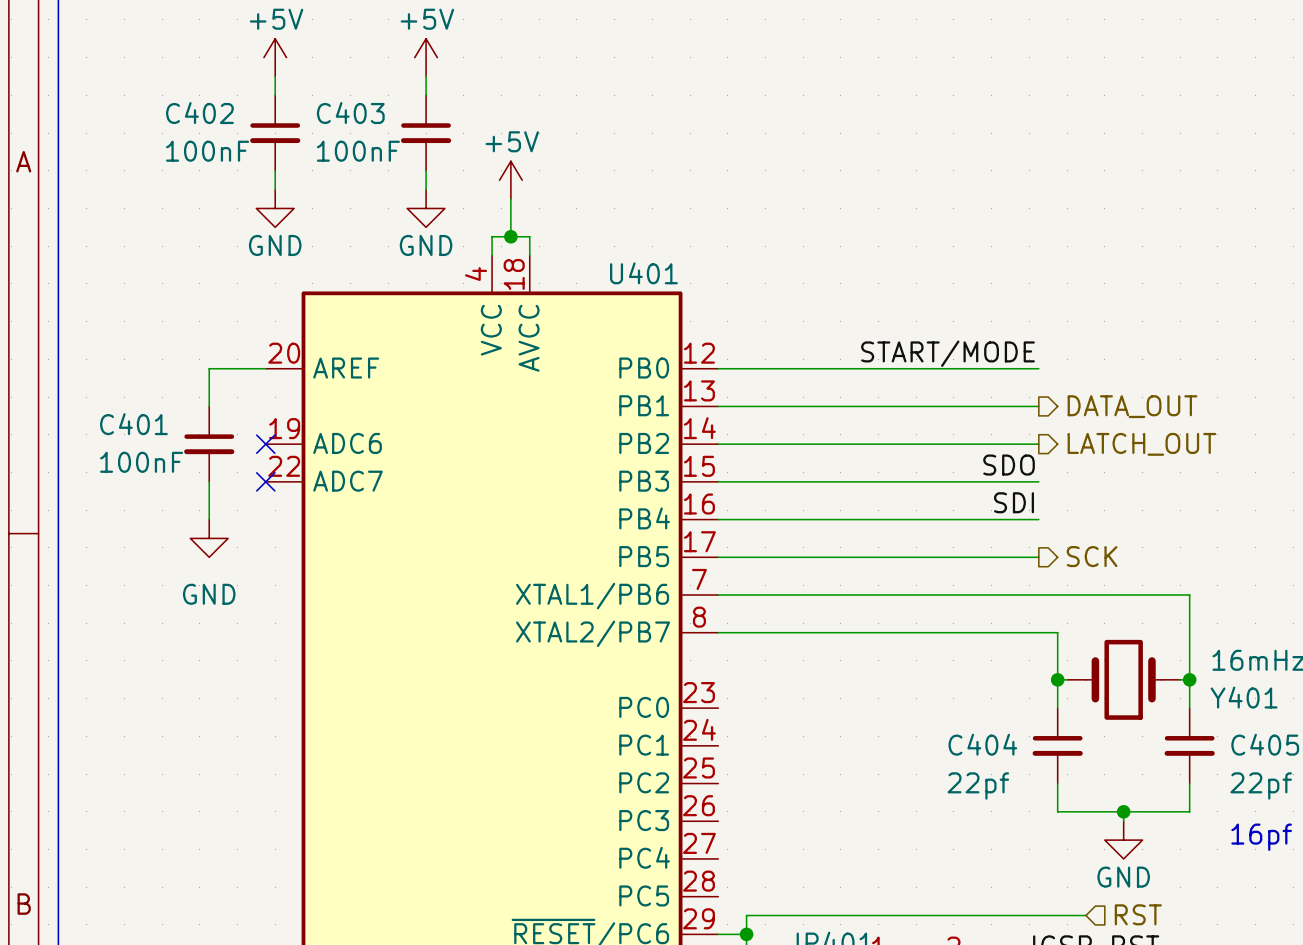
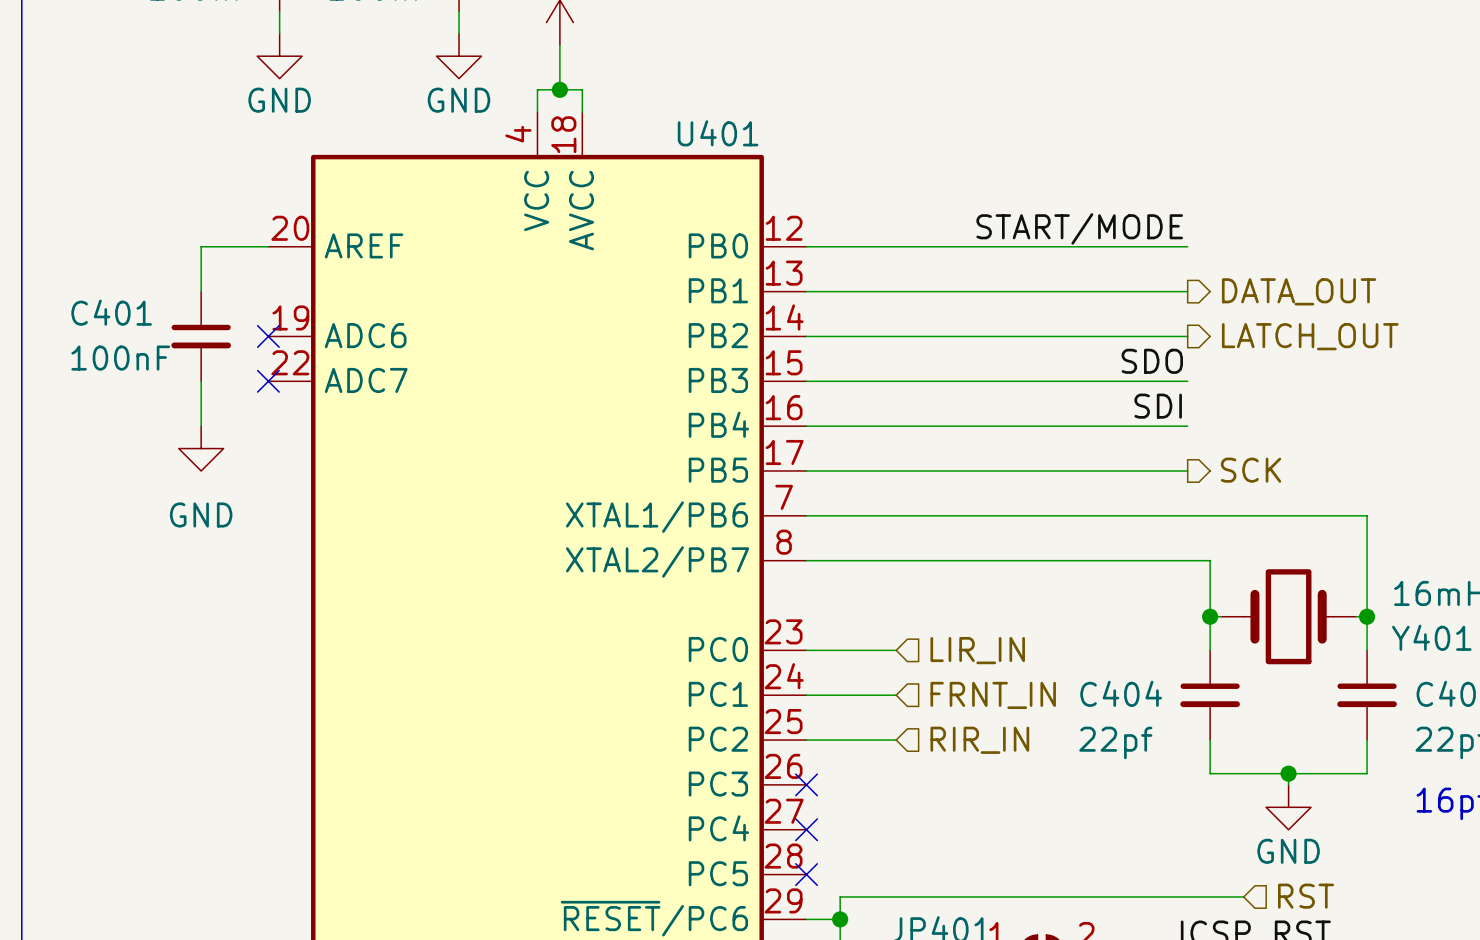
wire: none -> (806, 650) (896, 650)
hierarchical label: none -> LIR_IN (977, 650)
wire: none -> (806, 695) (896, 695)
hierarchical label: none -> FRNT_IN (993, 695)
wire: none -> (806, 740) (896, 740)
hierarchical label: none -> RIR_IN (979, 740)
no-connect mark: none -> (806, 784)
no-connect mark: none -> (806, 829)
no-connect mark: none -> (806, 874)

